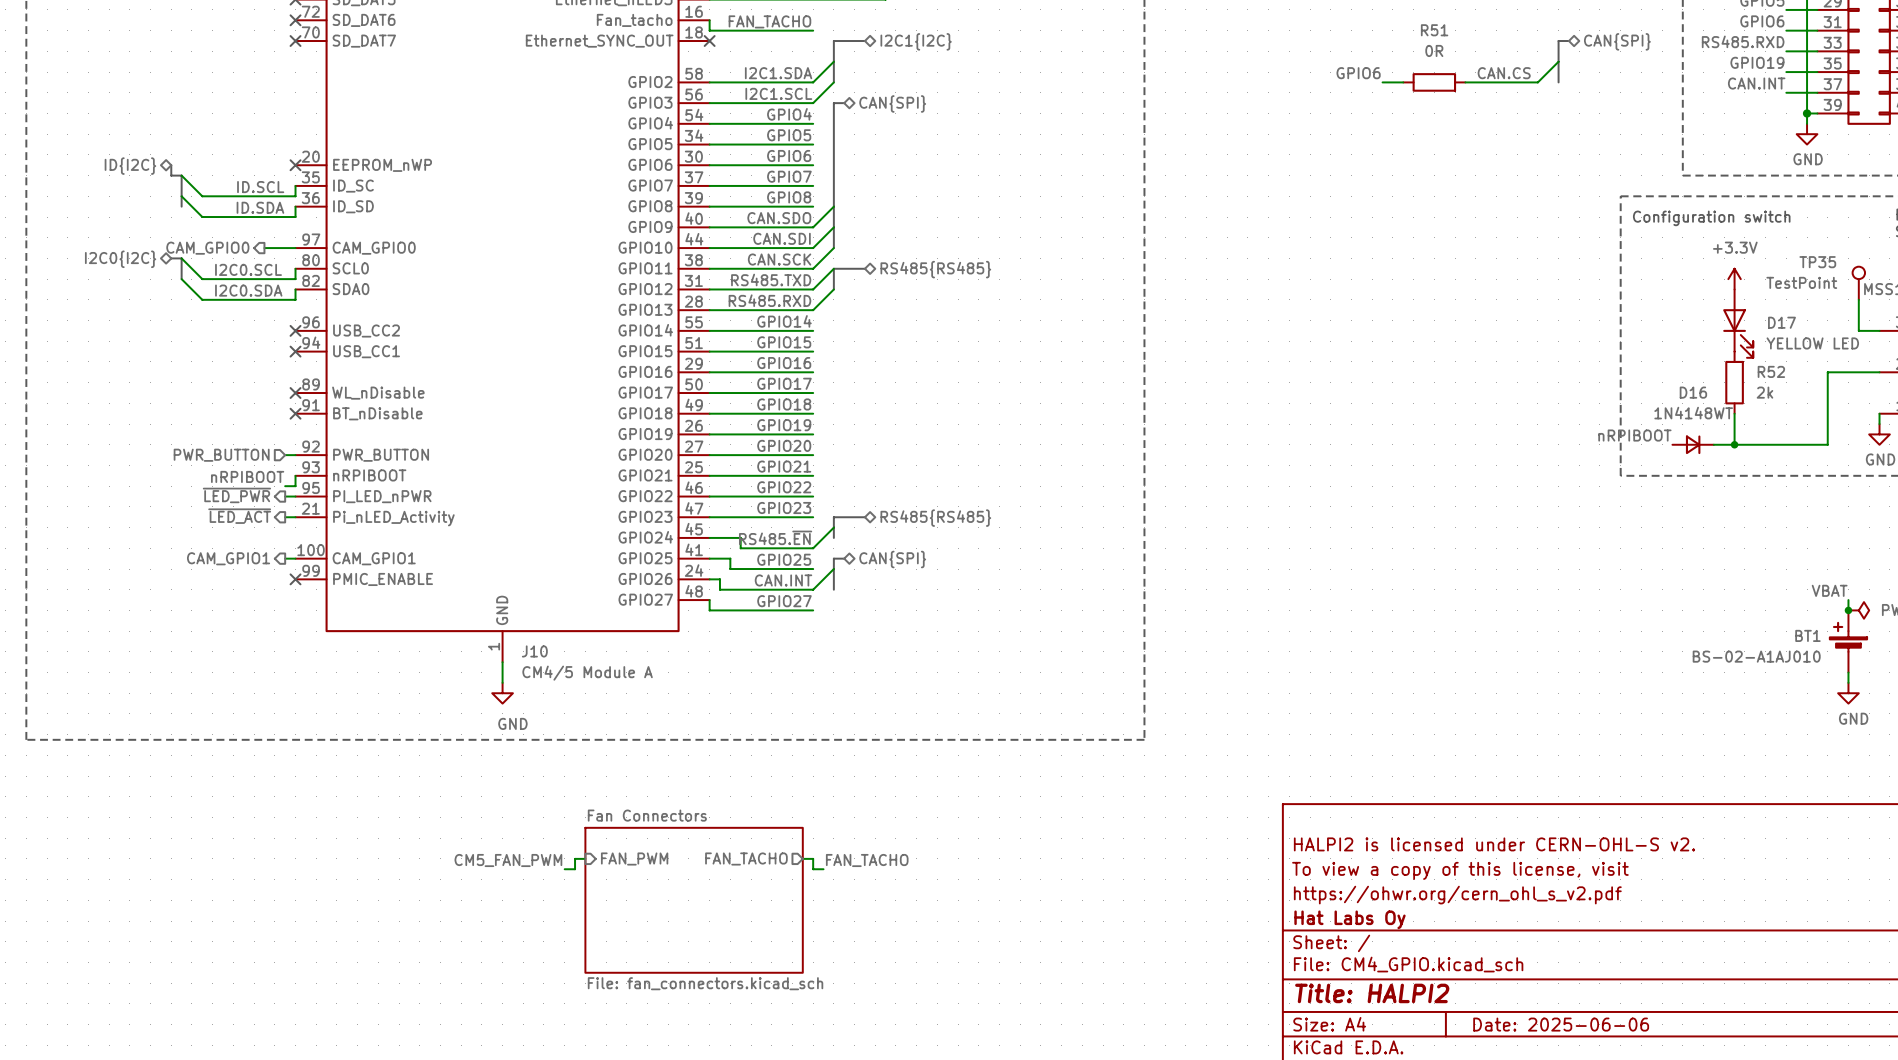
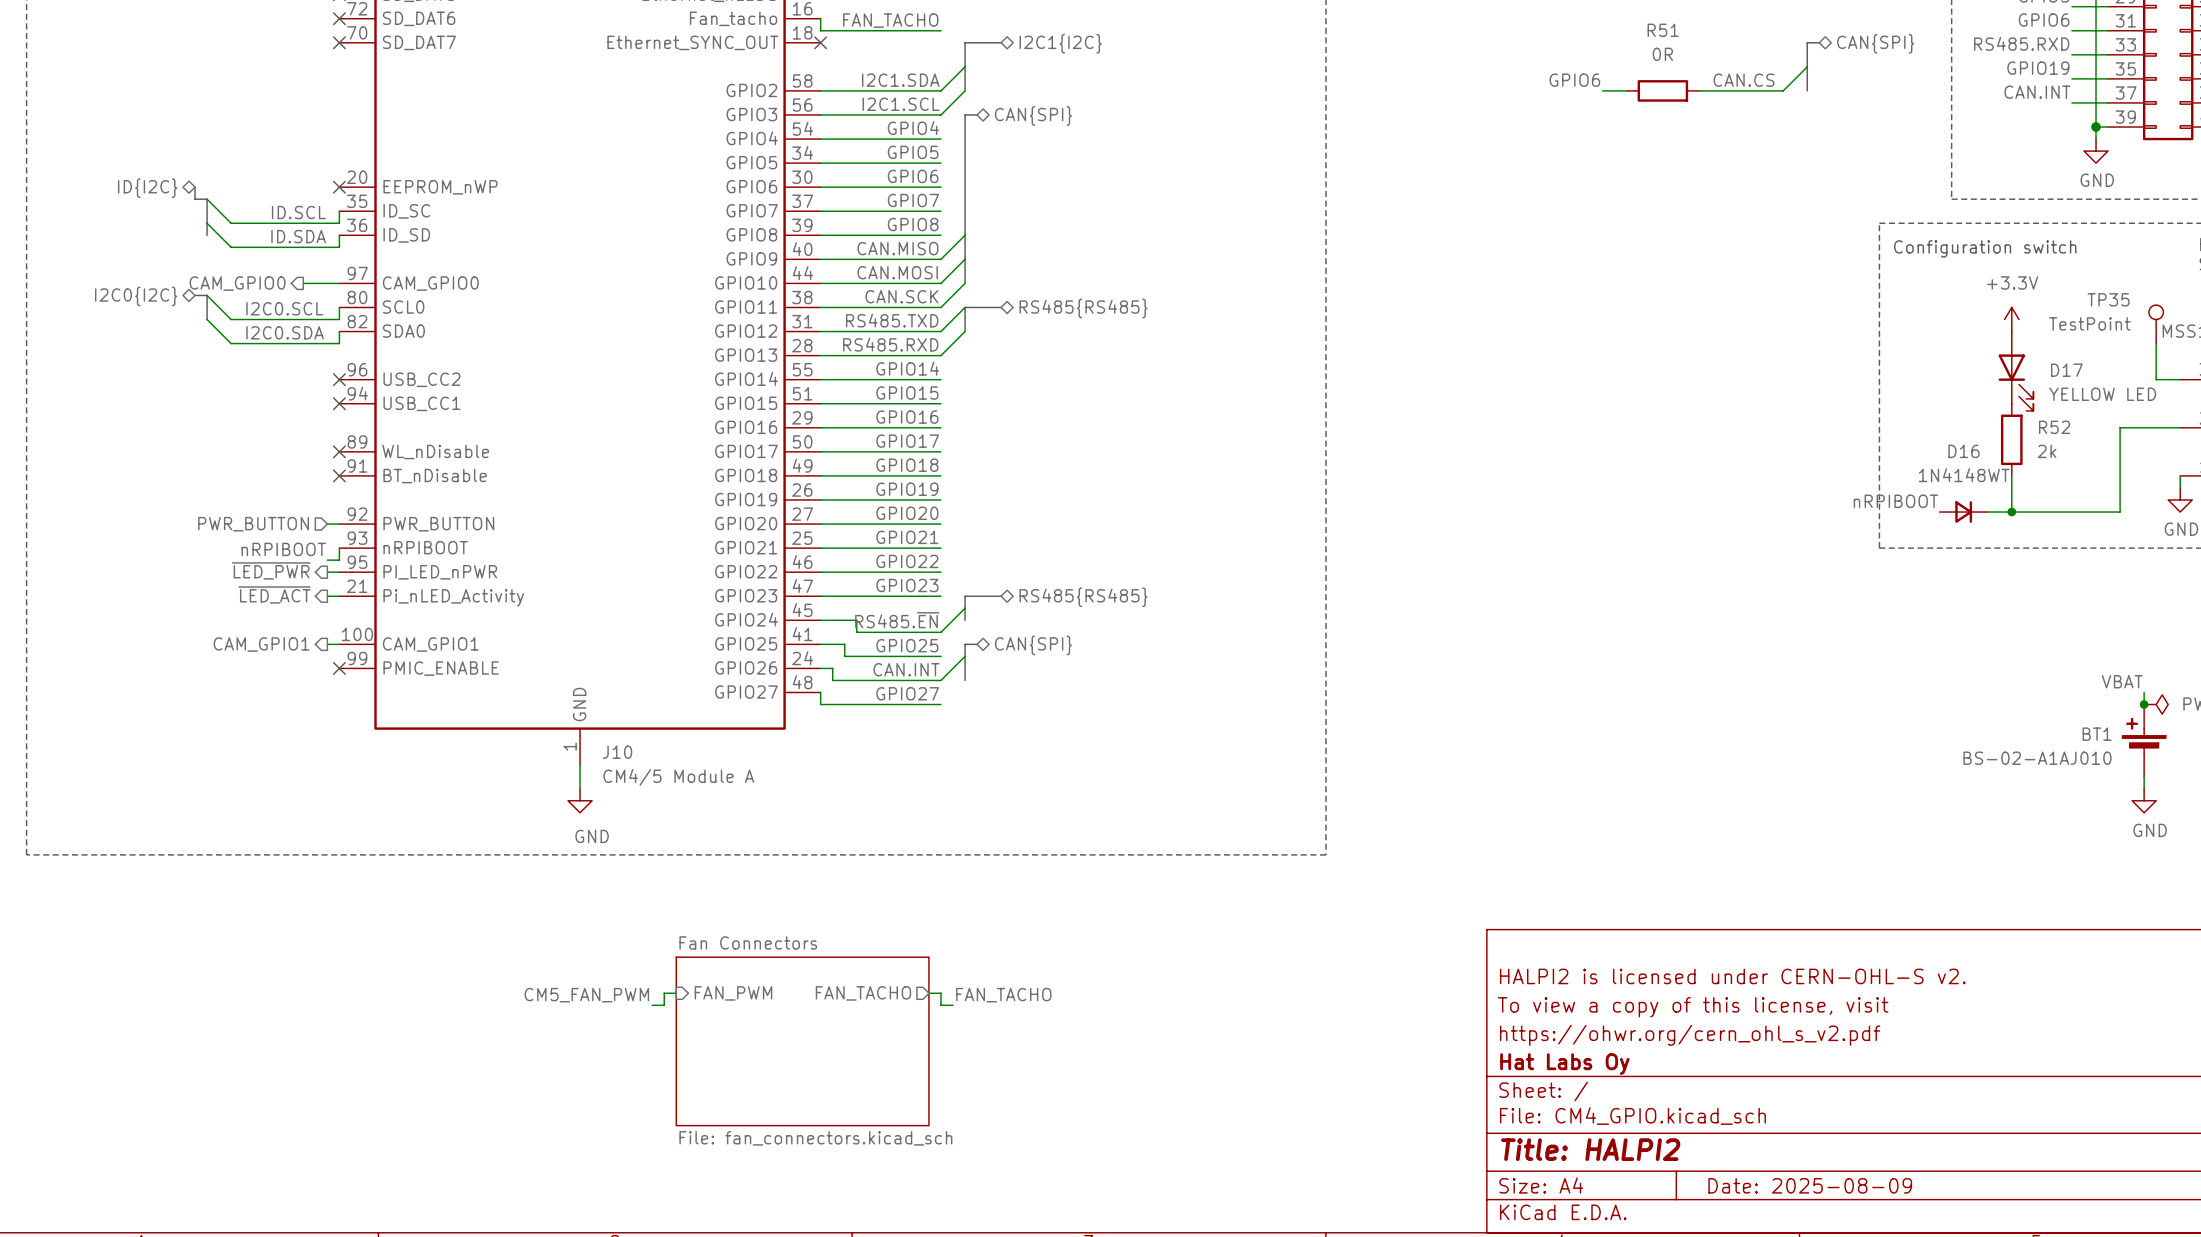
label: CAN.SDO (779, 218) -> CAN.MISO (897, 248)
label: CAN.SDI (782, 238) -> CAN.MOSI (897, 272)
title block: Date: 2025-06-06 (1561, 1024) -> Date: 2025-08-09 (1810, 1185)

